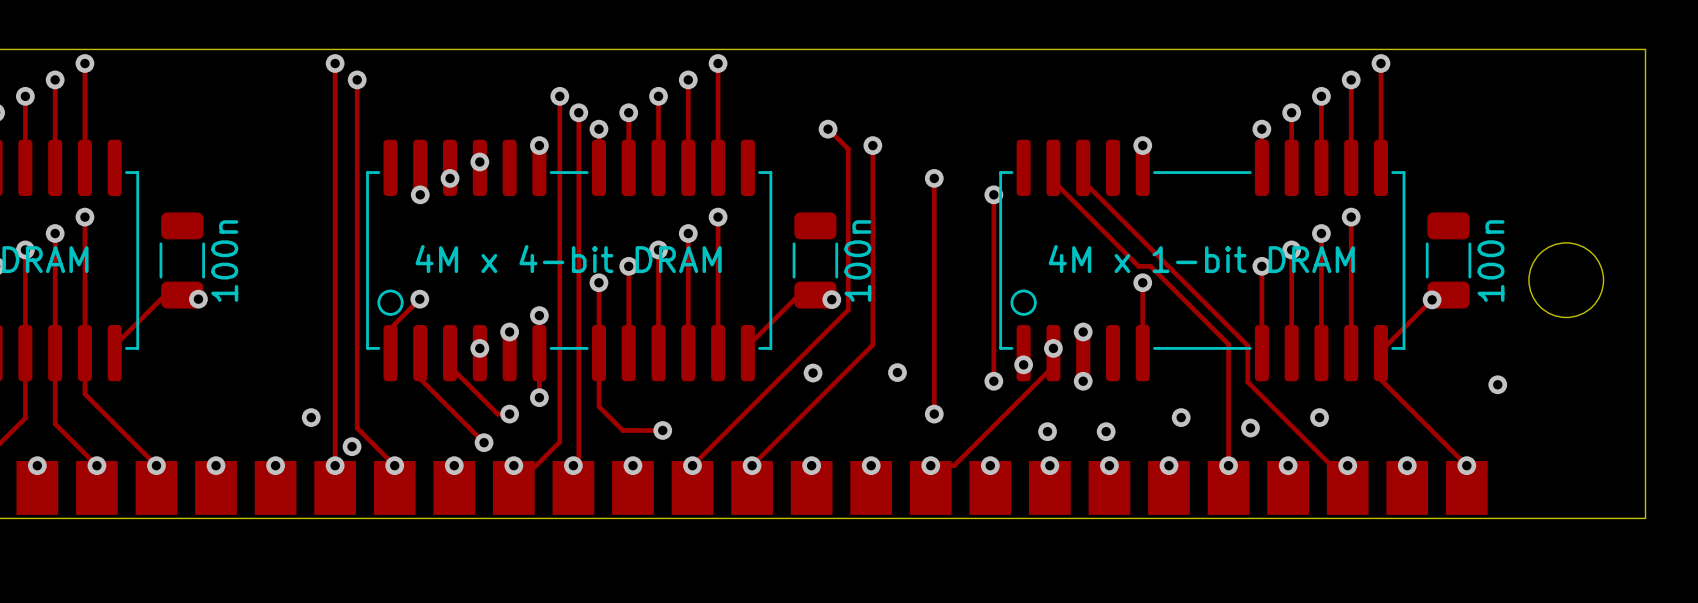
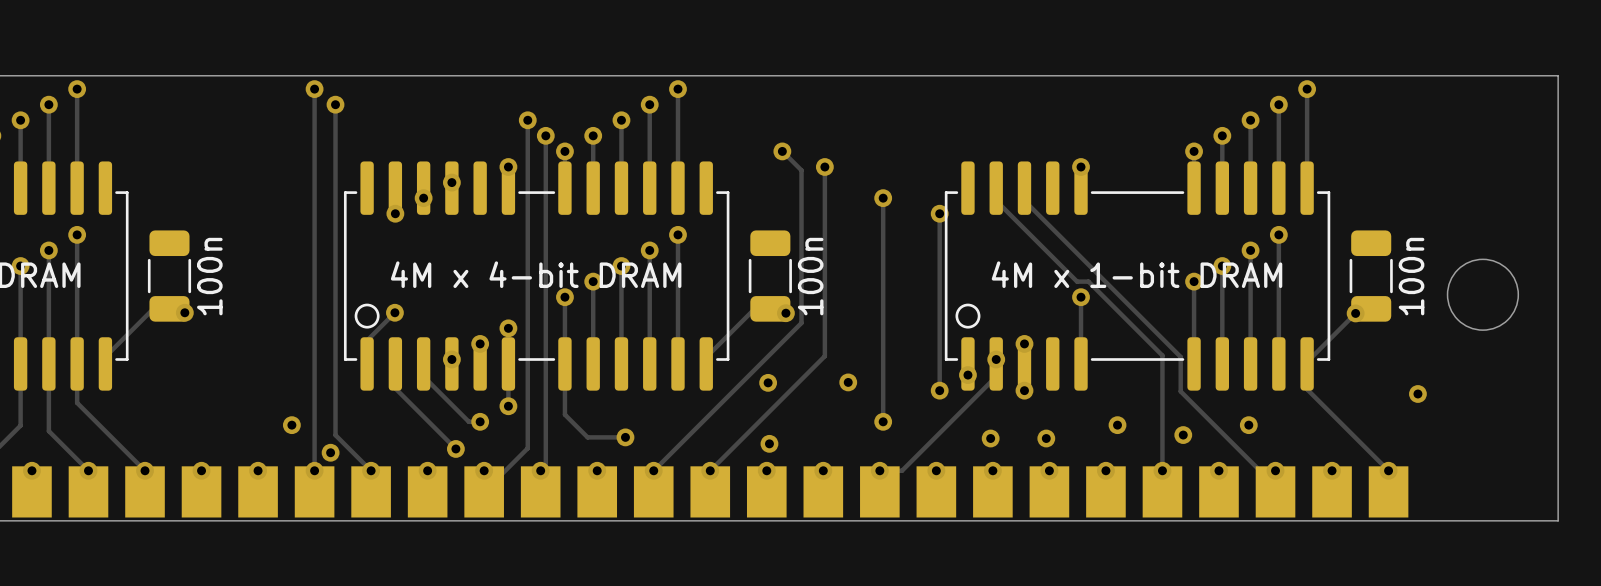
via: none -> (769, 443)

